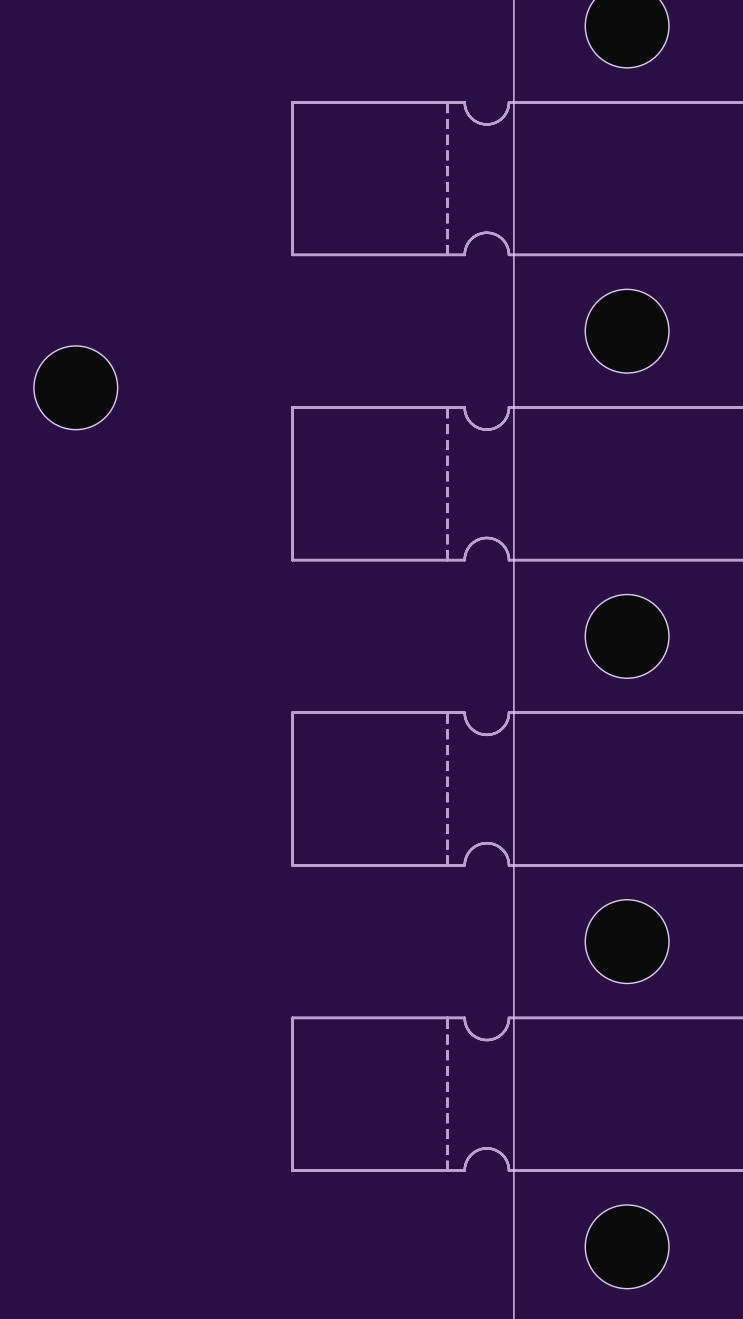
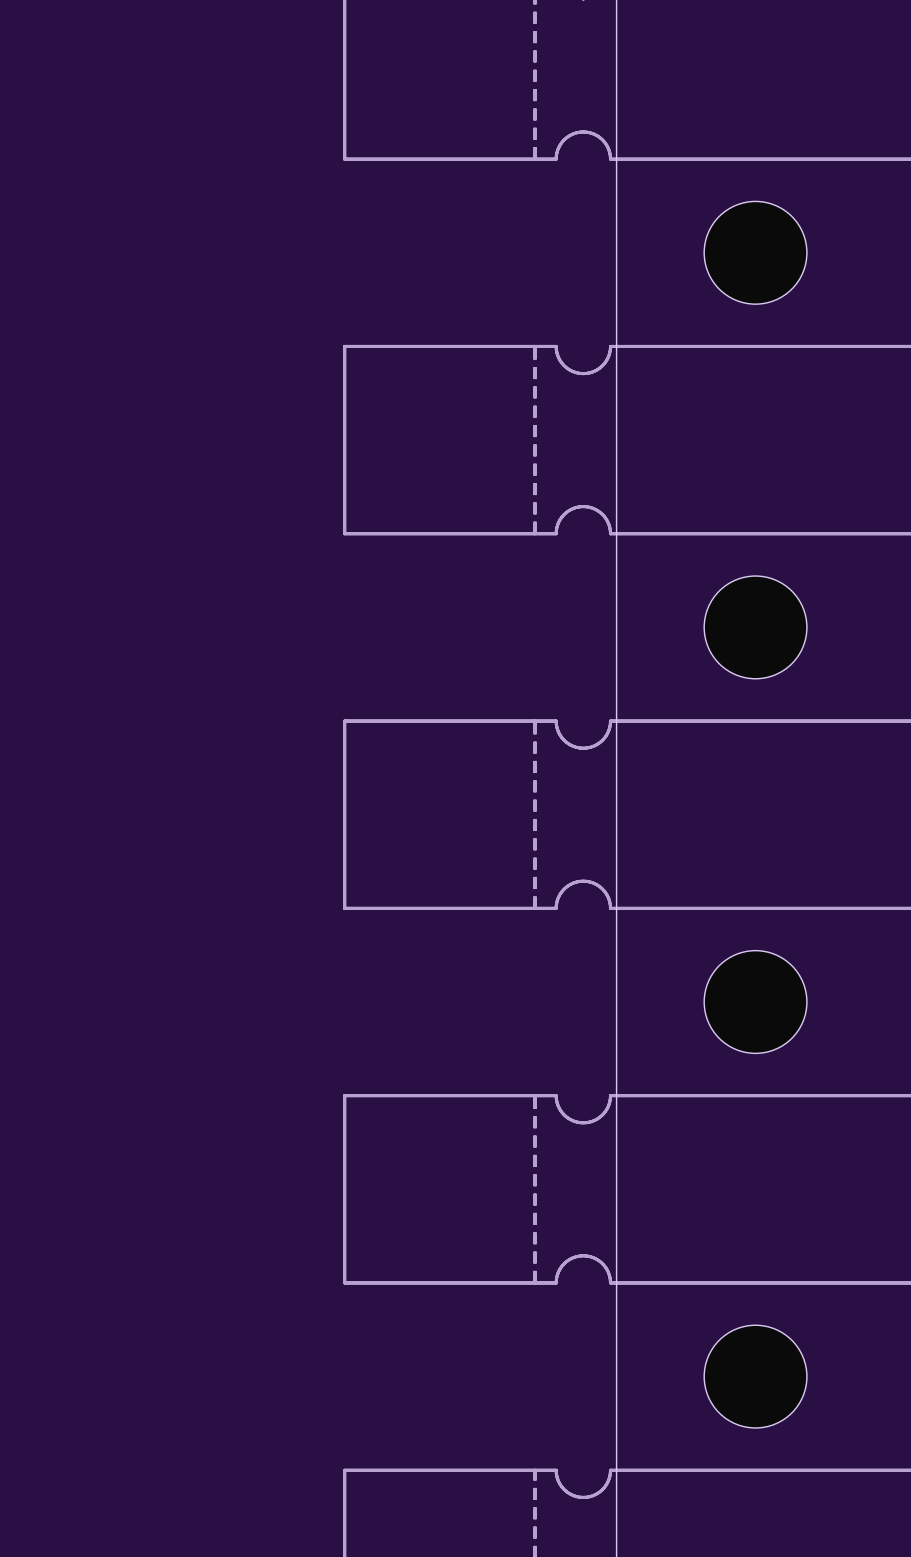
hole: (75, 387) -> none

